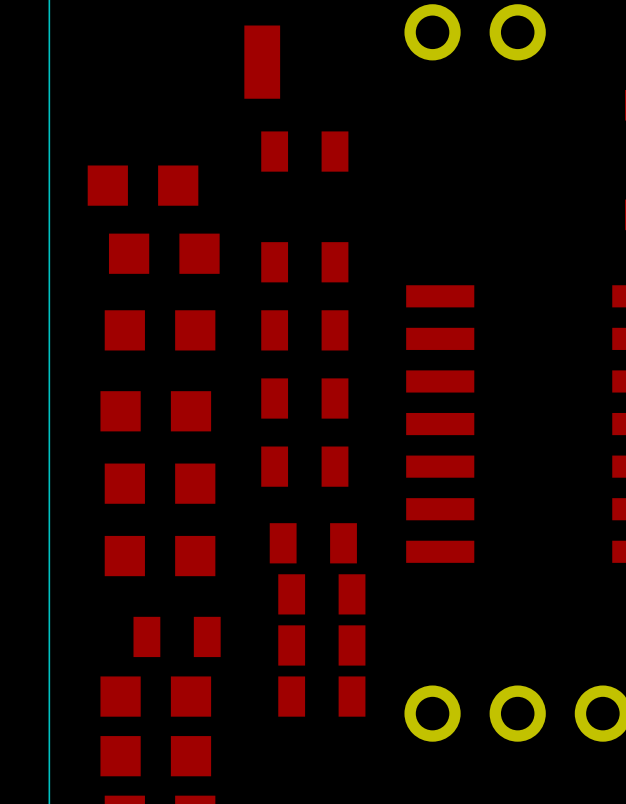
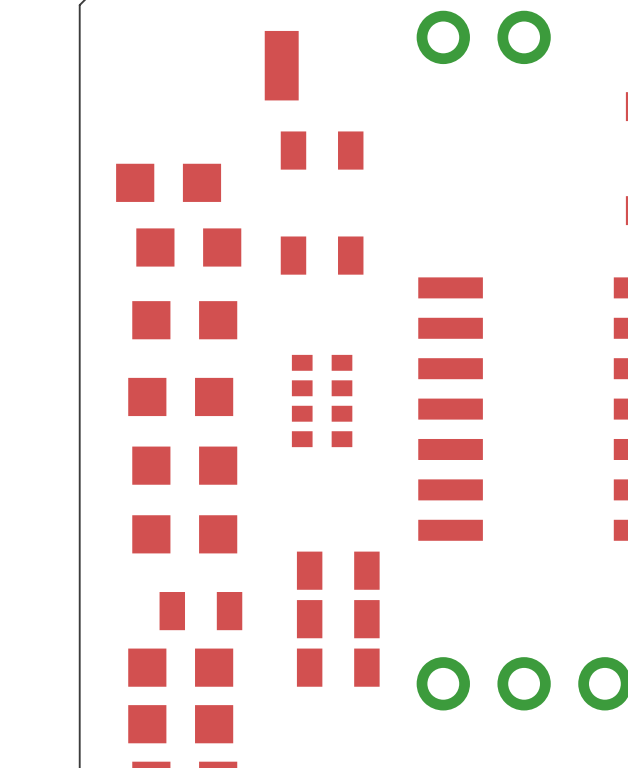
part: (304, 330) -> none
part footprint: [261, 378, 349, 419] -> [291, 354, 353, 448]
part: (304, 466) -> none
part: (313, 543) -> none

